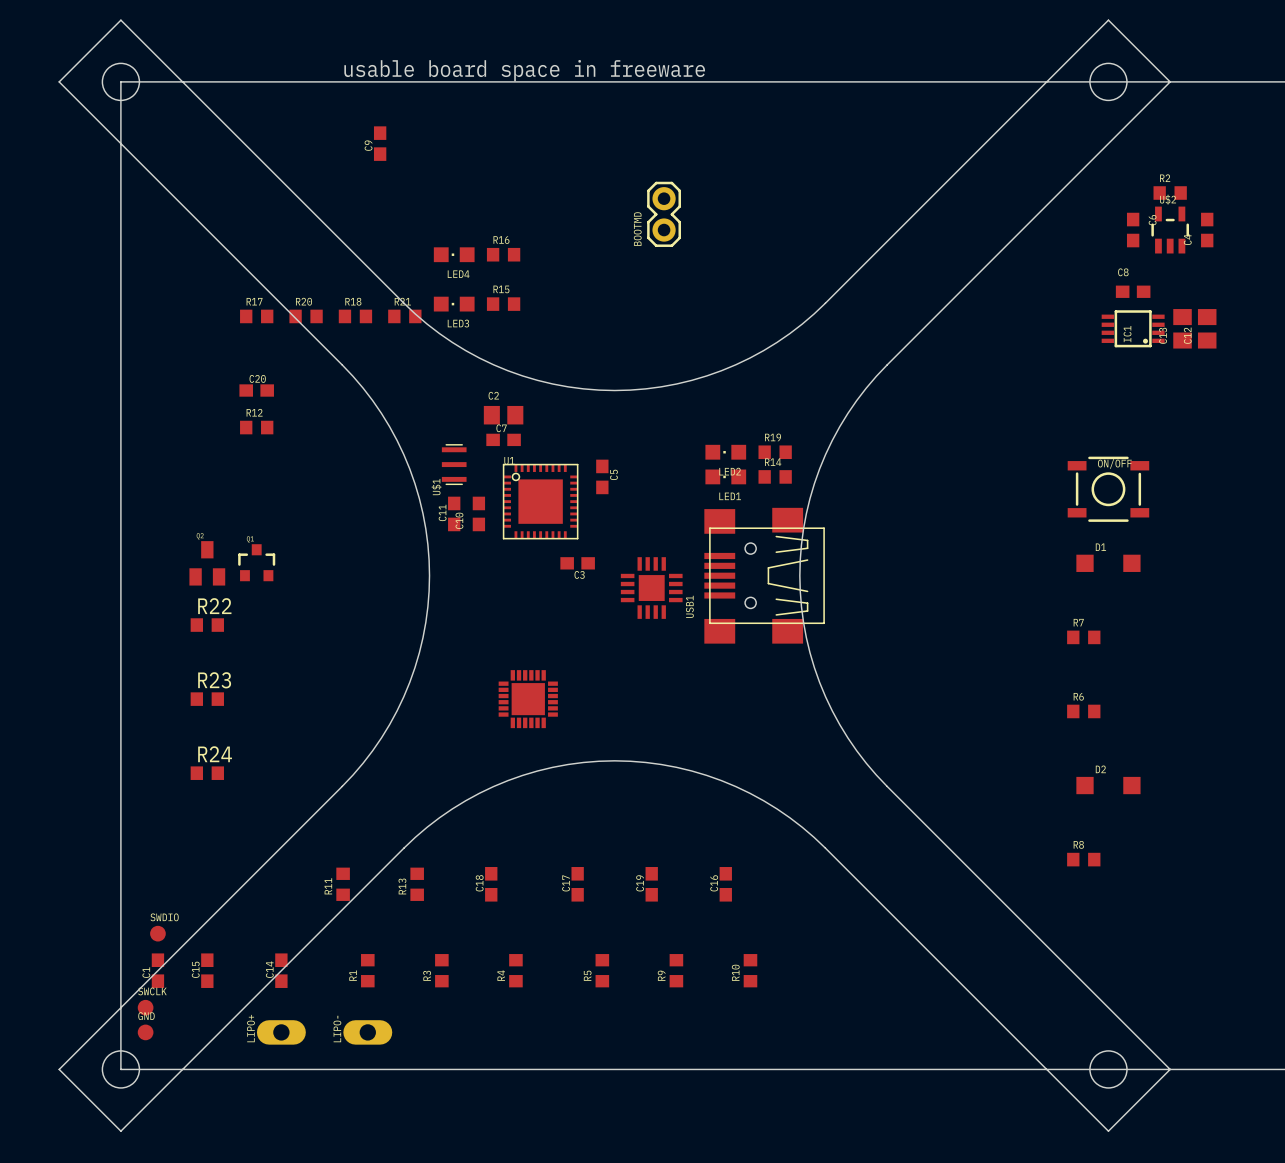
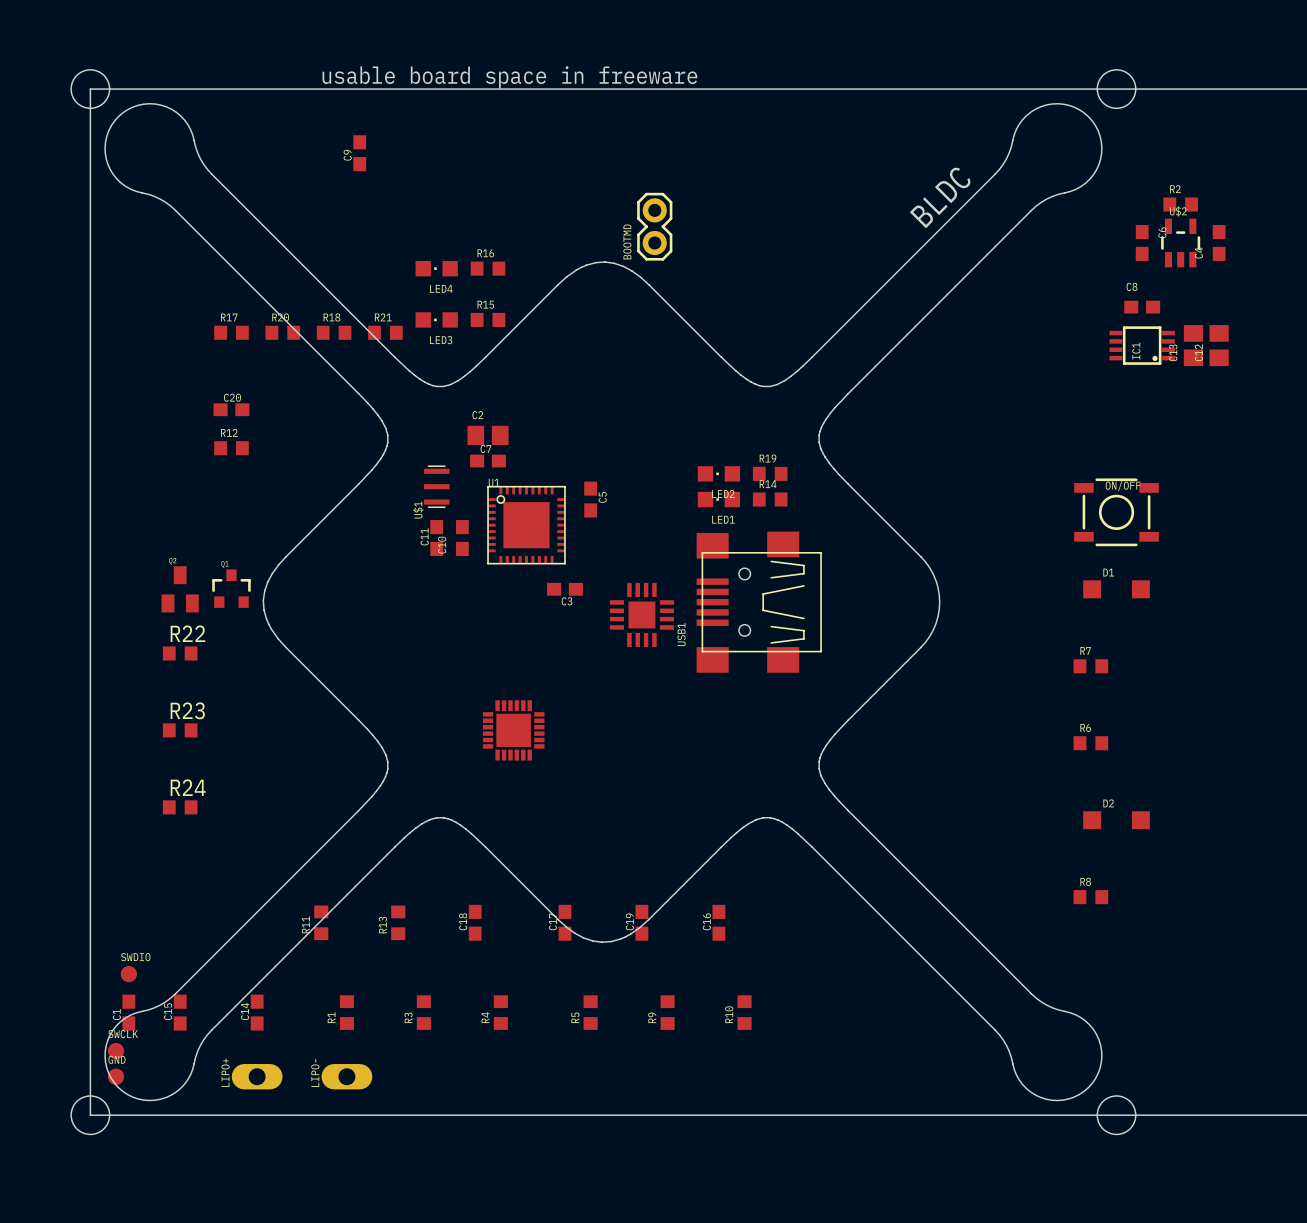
board edge: (120, 20) (403, 303) (427, 324) (465, 350) (507, 370) (552, 384) (599, 390) (645, 388) (691, 380) (721, 370) (749, 358) (789, 333) (825, 303) (1108, 20) (1170, 81) (887, 364) (866, 388) (839, 426) (819, 468) (806, 513) (800, 560) (801, 606) (810, 652) (819, 682) (832, 710) (856, 750) (887, 786) (1170, 1069) (1108, 1131) (825, 848) (802, 827) (763, 800) (721, 780) (676, 767) (630, 761) (583, 762) (537, 770) (507, 780) (479, 793) (439, 817) (403, 848) (120, 1131) (59, 1069) (342, 786) (363, 763) (389, 724) (409, 682) (423, 637) (429, 591) (427, 544) (419, 498) (409, 468) (397, 440) (372, 400) (342, 364) (59, 81) (120, 20) -> (194, 140) (184, 119) (171, 109) (154, 104) (137, 105) (122, 113) (111, 125) (105, 142) (106, 159) (110, 169) (121, 183) (130, 189) (160, 199) (175, 210) (358, 393) (377, 414) (385, 428) (387, 442) (380, 459) (358, 484) (278, 564) (267, 582) (263, 600) (266, 619) (278, 638) (372, 735) (385, 754) (387, 769) (380, 785) (358, 810) (175, 993) (160, 1005) (130, 1014) (117, 1025) (108, 1039) (105, 1056) (108, 1073) (118, 1087) (132, 1096) (149, 1100) (166, 1097) (180, 1088) (190, 1074) (200, 1045) (211, 1030) (404, 838) (422, 823) (436, 817) (451, 820) (471, 833) (566, 926) (583, 937) (601, 942) (620, 939) (640, 927) (730, 838) (748, 823) (763, 817) (778, 820) (792, 829) (812, 847) (995, 1030) (1006, 1045) (1016, 1074) (1026, 1088) (1040, 1097) (1057, 1100) (1074, 1096) (1088, 1087) (1098, 1073) (1101, 1056) (1098, 1039) (1089, 1025) (1075, 1014) (1046, 1005) (1031, 993) (839, 801) (824, 783) (819, 768) (821, 754) (834, 734) (925, 642) (936, 623) (939, 602) (936, 580) (925, 562) (839, 474) (824, 456) (819, 442) (821, 427) (830, 413) (848, 393) (1031, 210) (1046, 199) (1075, 189) (1089, 179) (1098, 164) (1101, 147) (1098, 131) (1088, 116) (1074, 107) (1057, 103) (1040, 106) (1026, 115) (1016, 129) (1006, 158) (995, 174) (802, 366) (784, 380) (770, 386) (755, 384) (735, 370) (640, 277) (623, 266) (605, 262) (586, 265) (566, 276) (476, 366) (458, 380) (443, 386) (428, 384) (414, 375) (394, 357) (211, 174) (200, 158) (194, 140)
text: none -> BLDC (940, 198)

